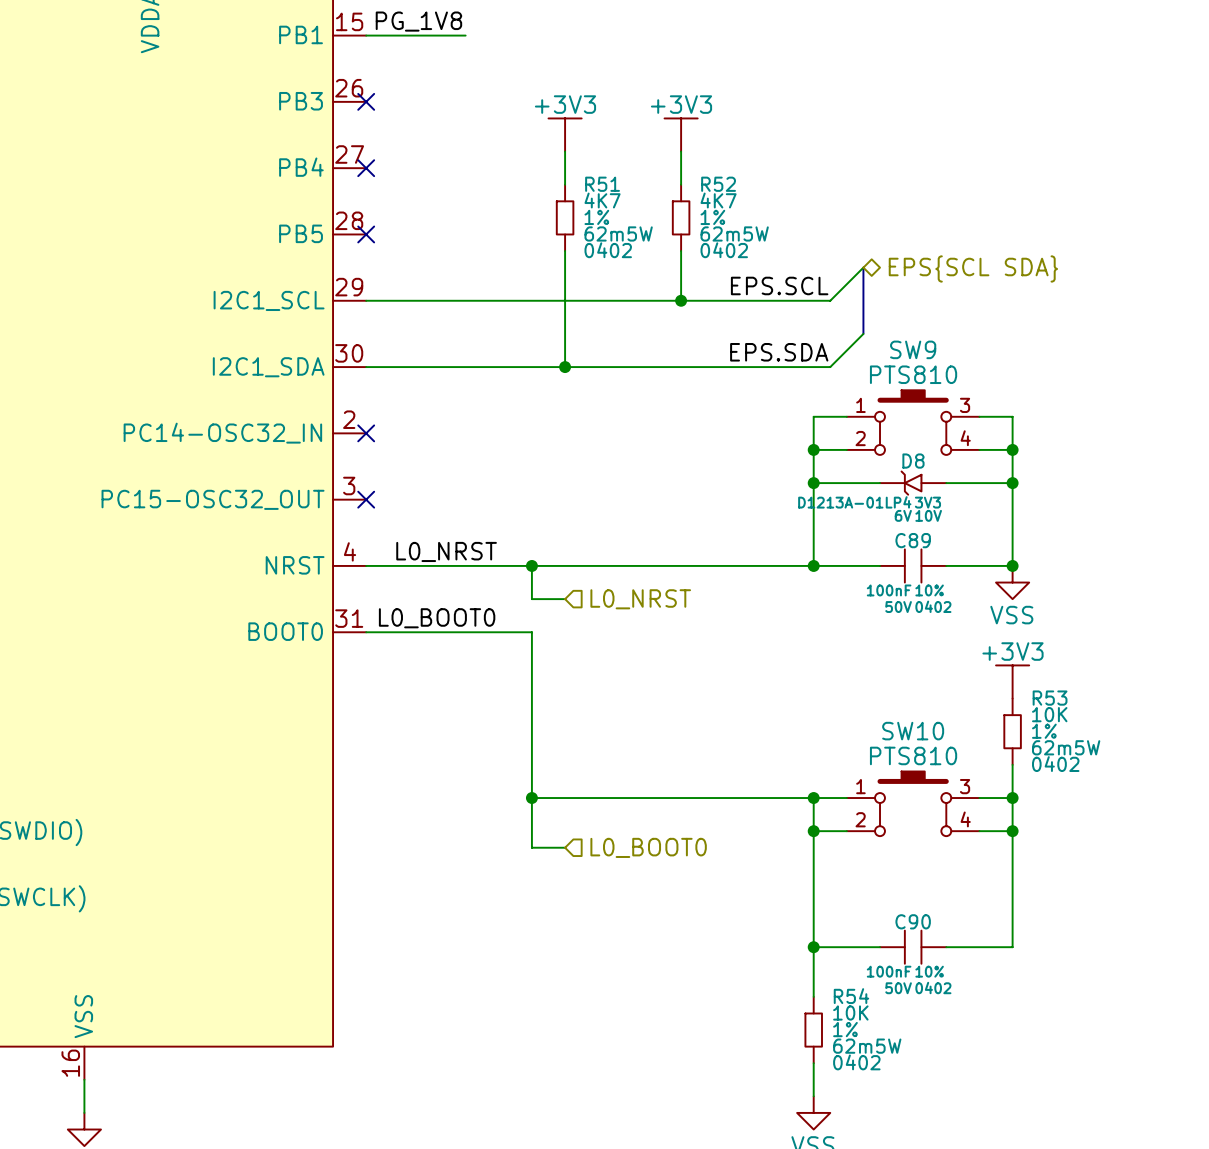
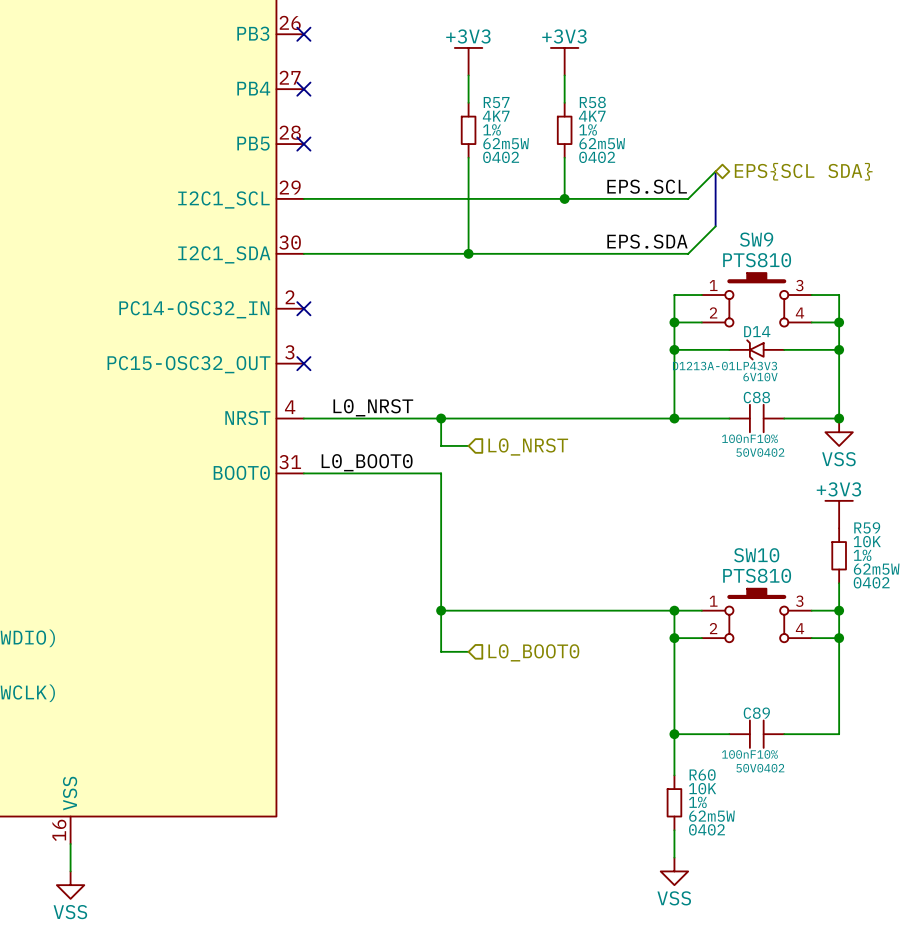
R51 name: R51 (602, 184) -> R57 (496, 102)
R52 name: R52 (718, 184) -> R58 (592, 102)
D8 name: D8 (913, 461) -> D14 (757, 331)
C89 name: C89 (913, 540) -> C88 (756, 397)
R53 name: R53 (1050, 698) -> R59 (867, 527)
C90 name: C90 (913, 921) -> C89 (756, 713)
R54 name: R54 (851, 996) -> R60 (702, 774)

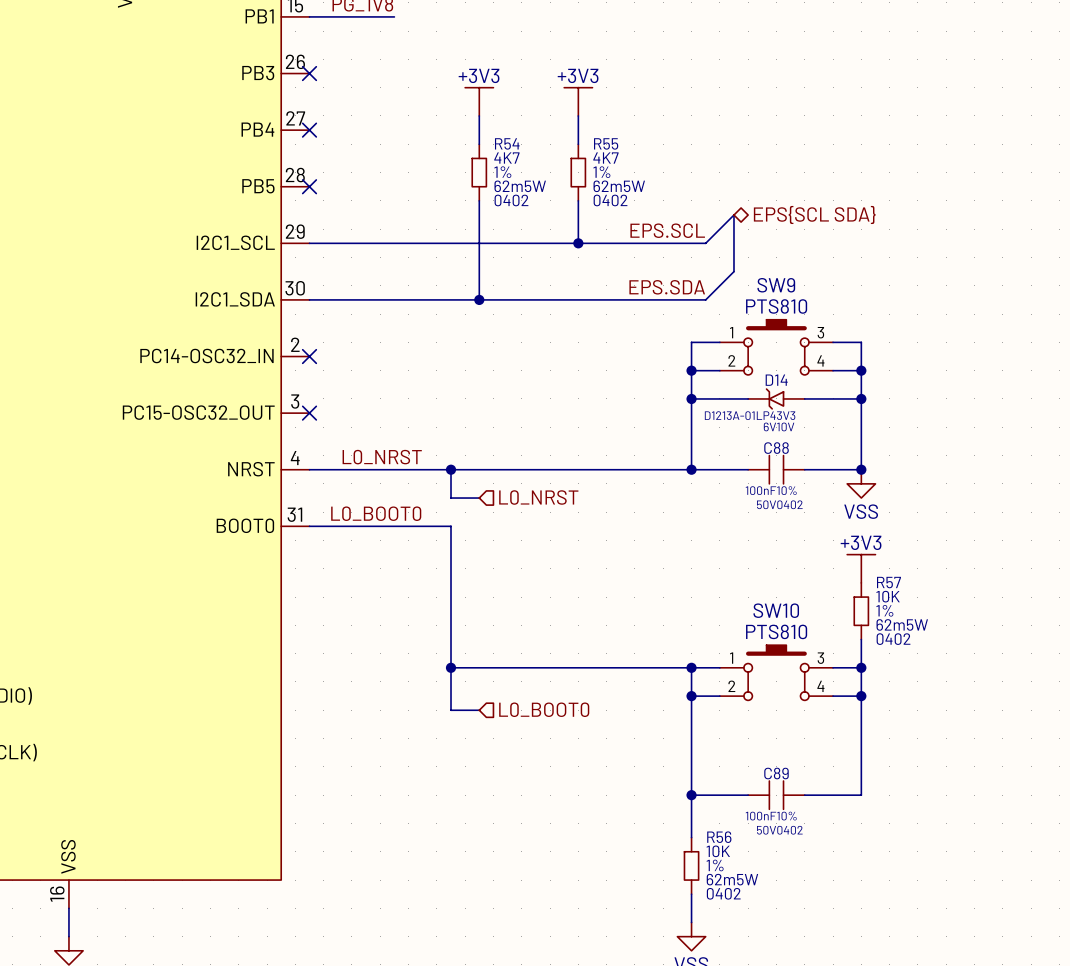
R57 name: R57 (496, 102) -> R54 (507, 143)
R58 name: R58 (592, 102) -> R55 (606, 143)
R59 name: R59 (867, 527) -> R57 (888, 582)
R60 name: R60 (702, 774) -> R56 (719, 837)

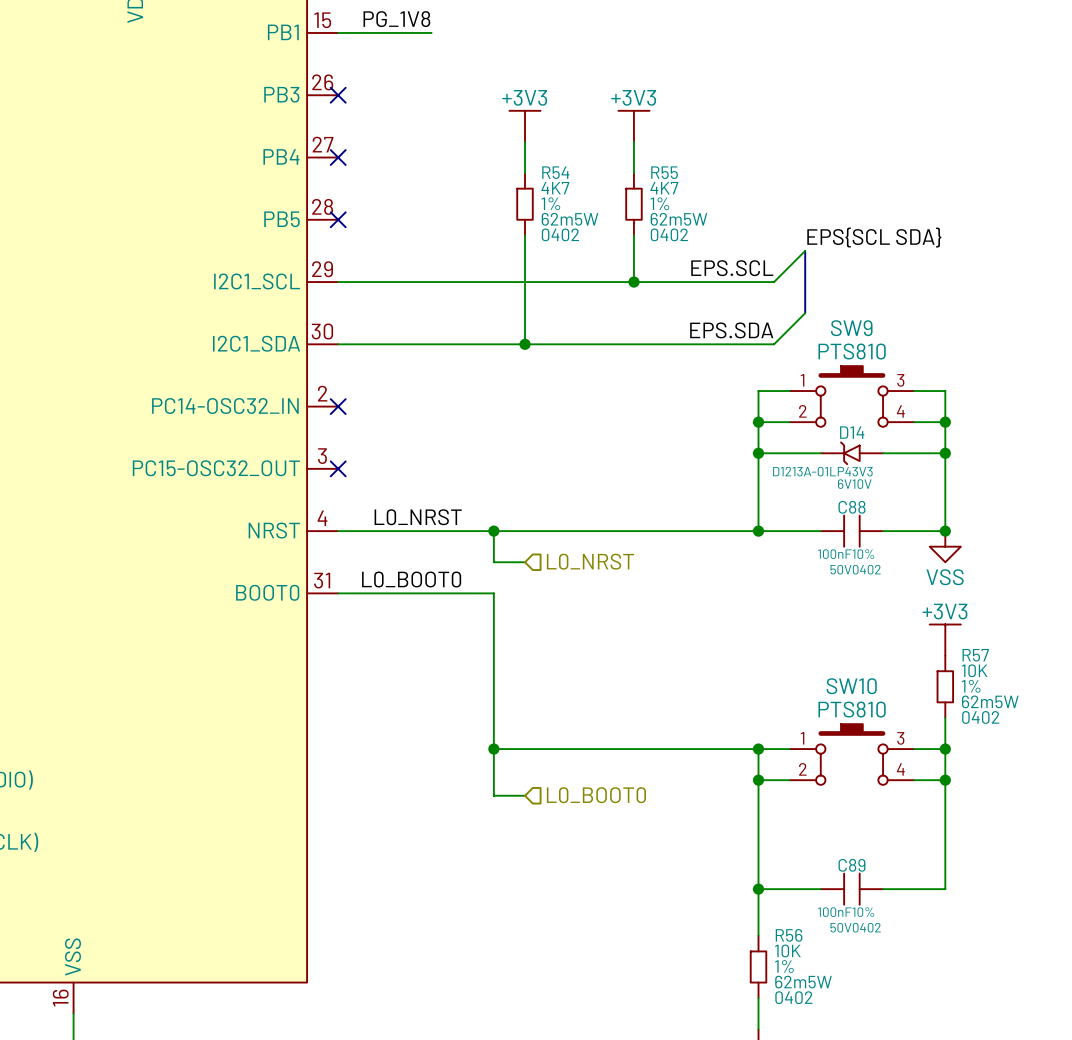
label: none -> EPS{SCL SDA} (874, 237)
hierarchical label: EPS{SCL SDA} (814, 214) -> none

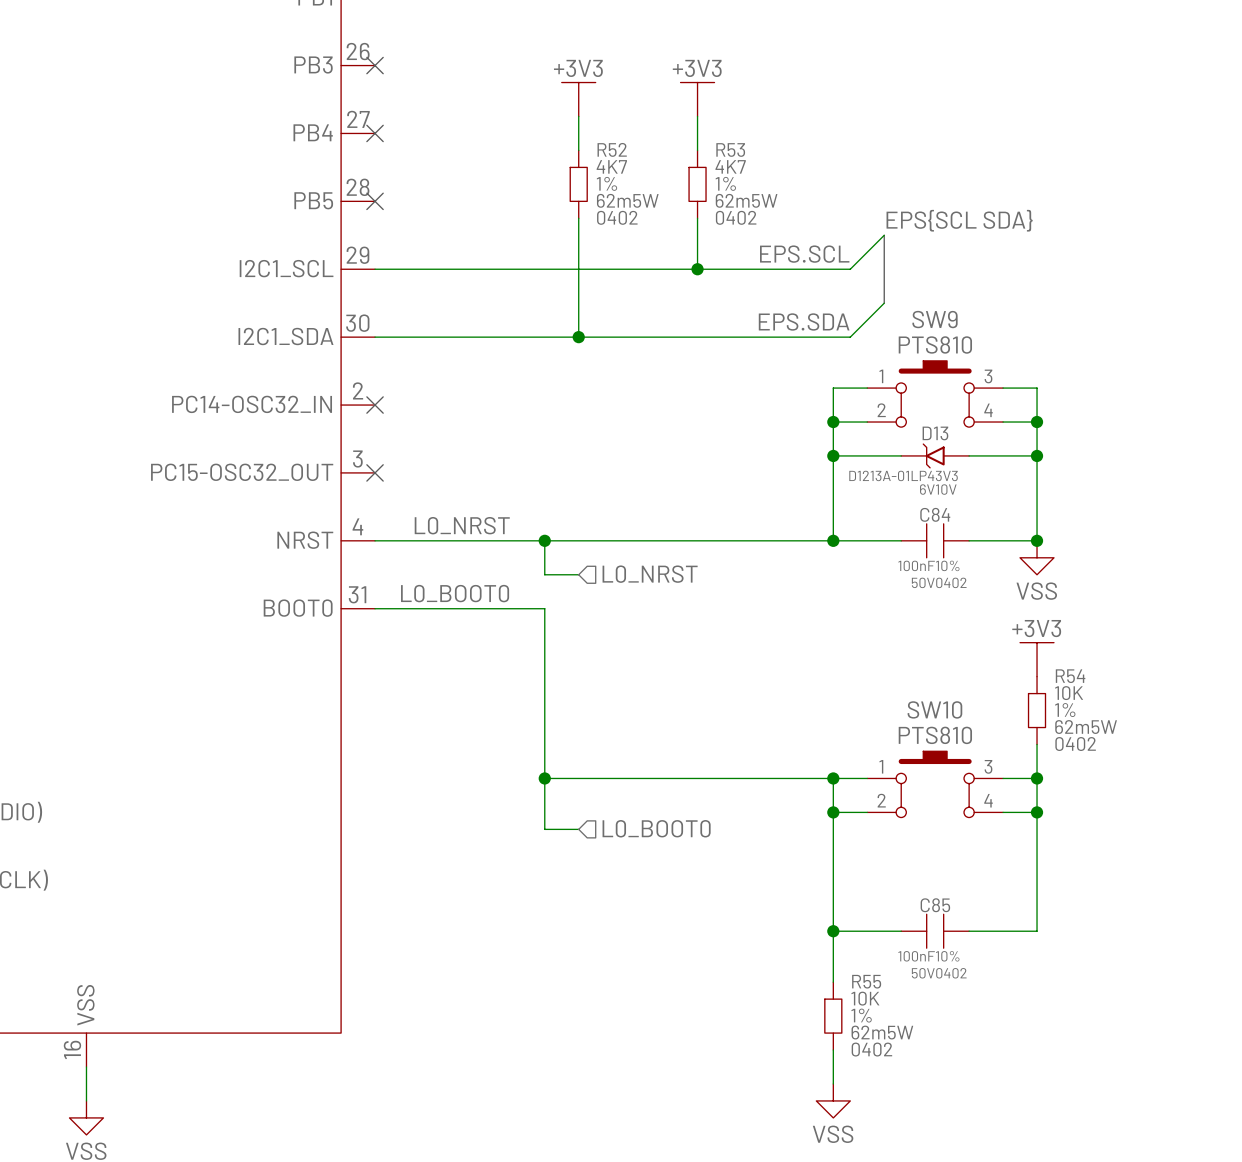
R54 name: R54 (555, 172) -> R52 (612, 149)
R55 name: R55 (664, 172) -> R53 (730, 150)
D14 name: D14 (852, 432) -> D13 (935, 433)
C88 name: C88 (852, 507) -> C84 (935, 514)
R57 name: R57 (975, 655) -> R54 (1070, 676)
C89 name: C89 (851, 865) -> C85 (935, 905)
R56 name: R56 (789, 935) -> R55 (866, 981)

